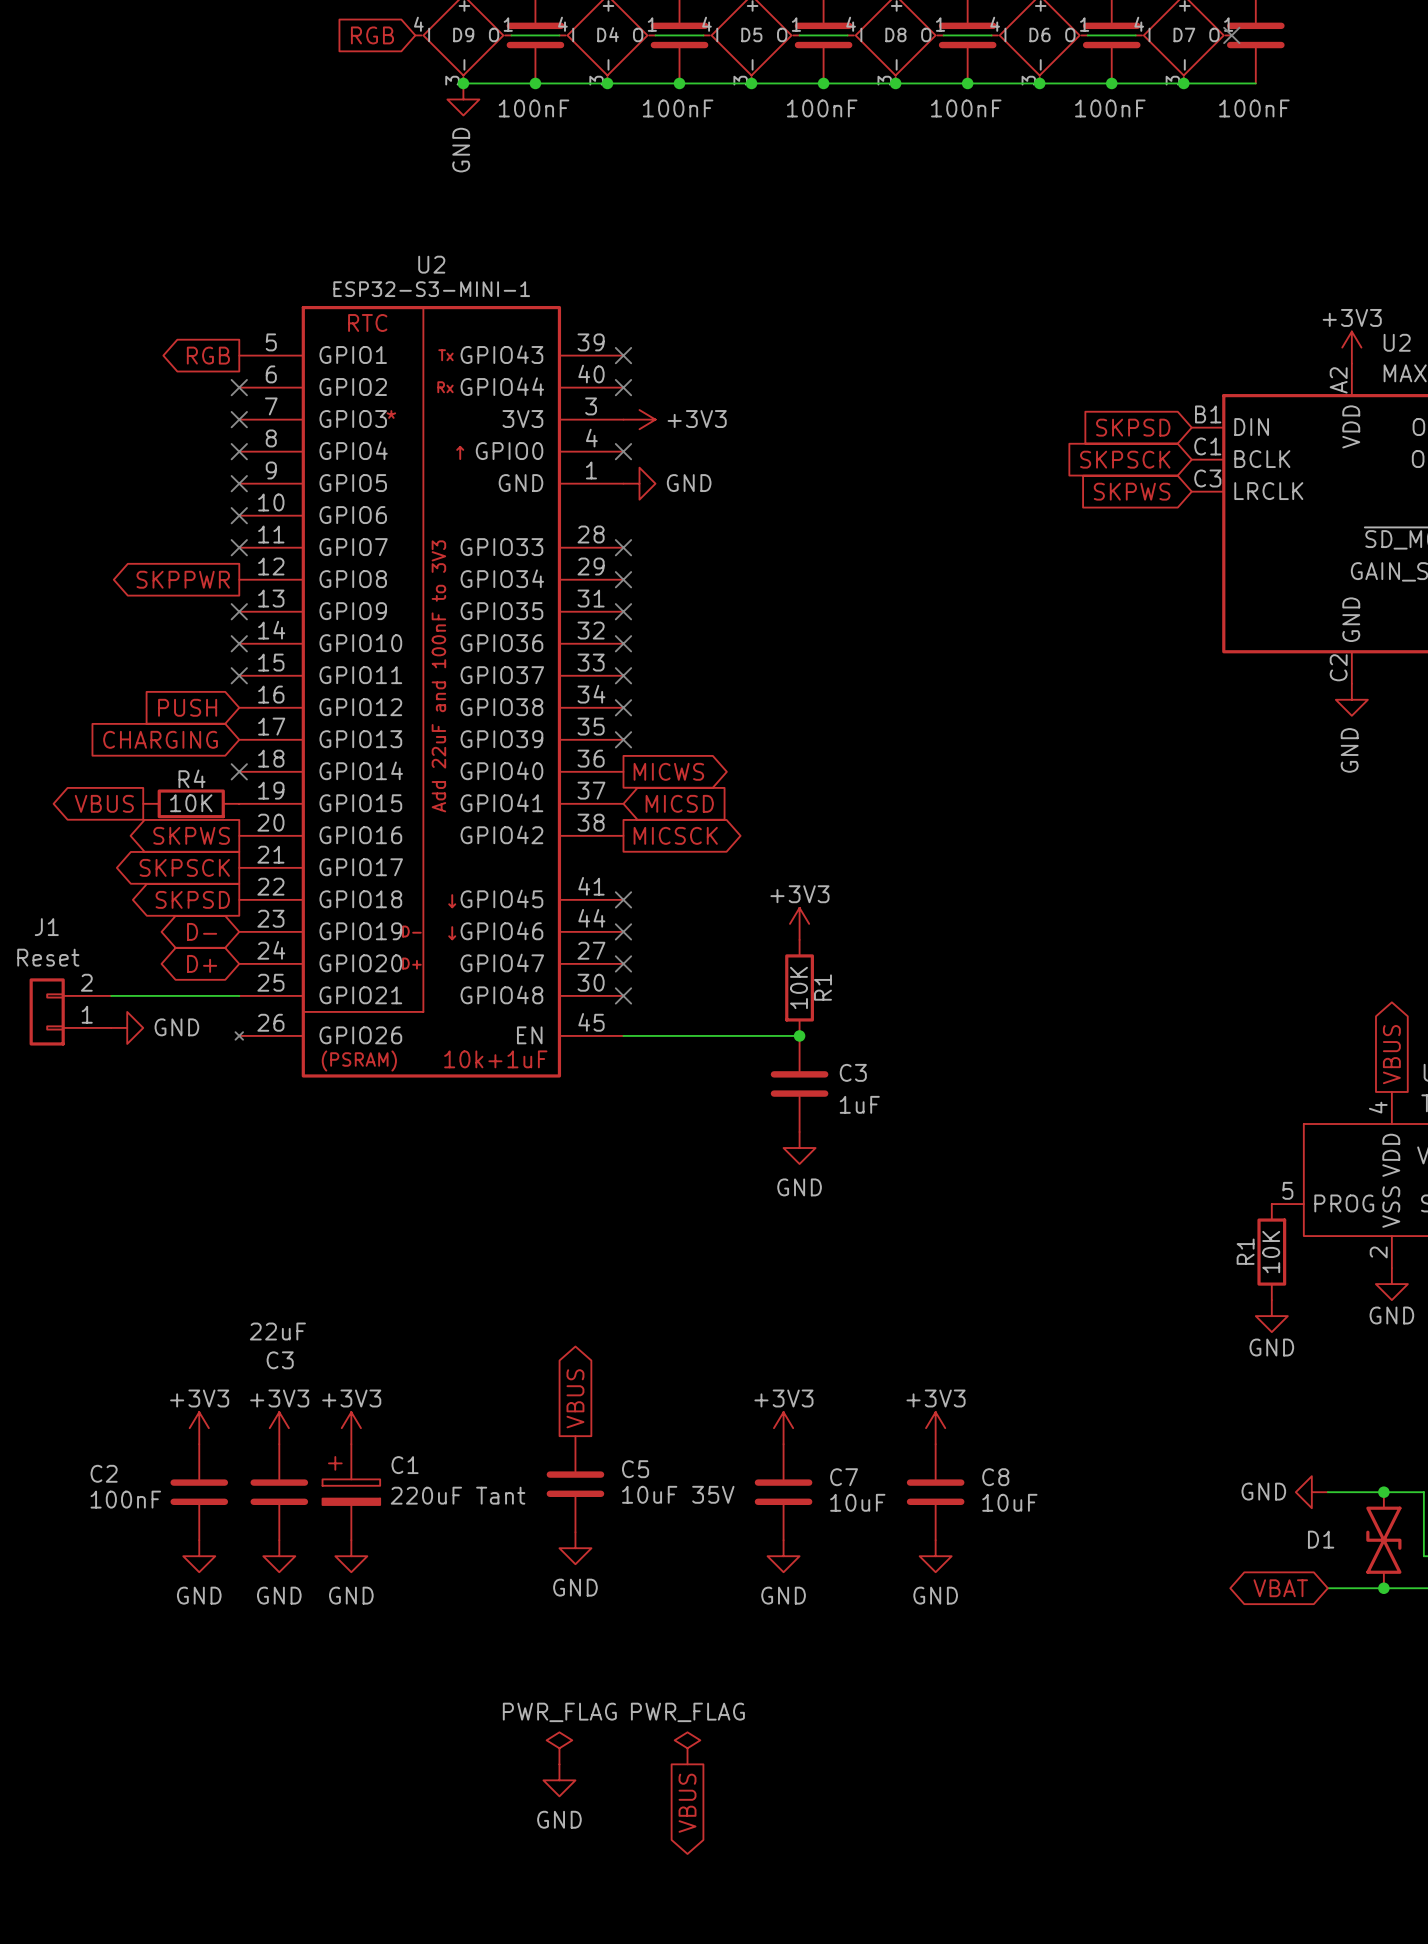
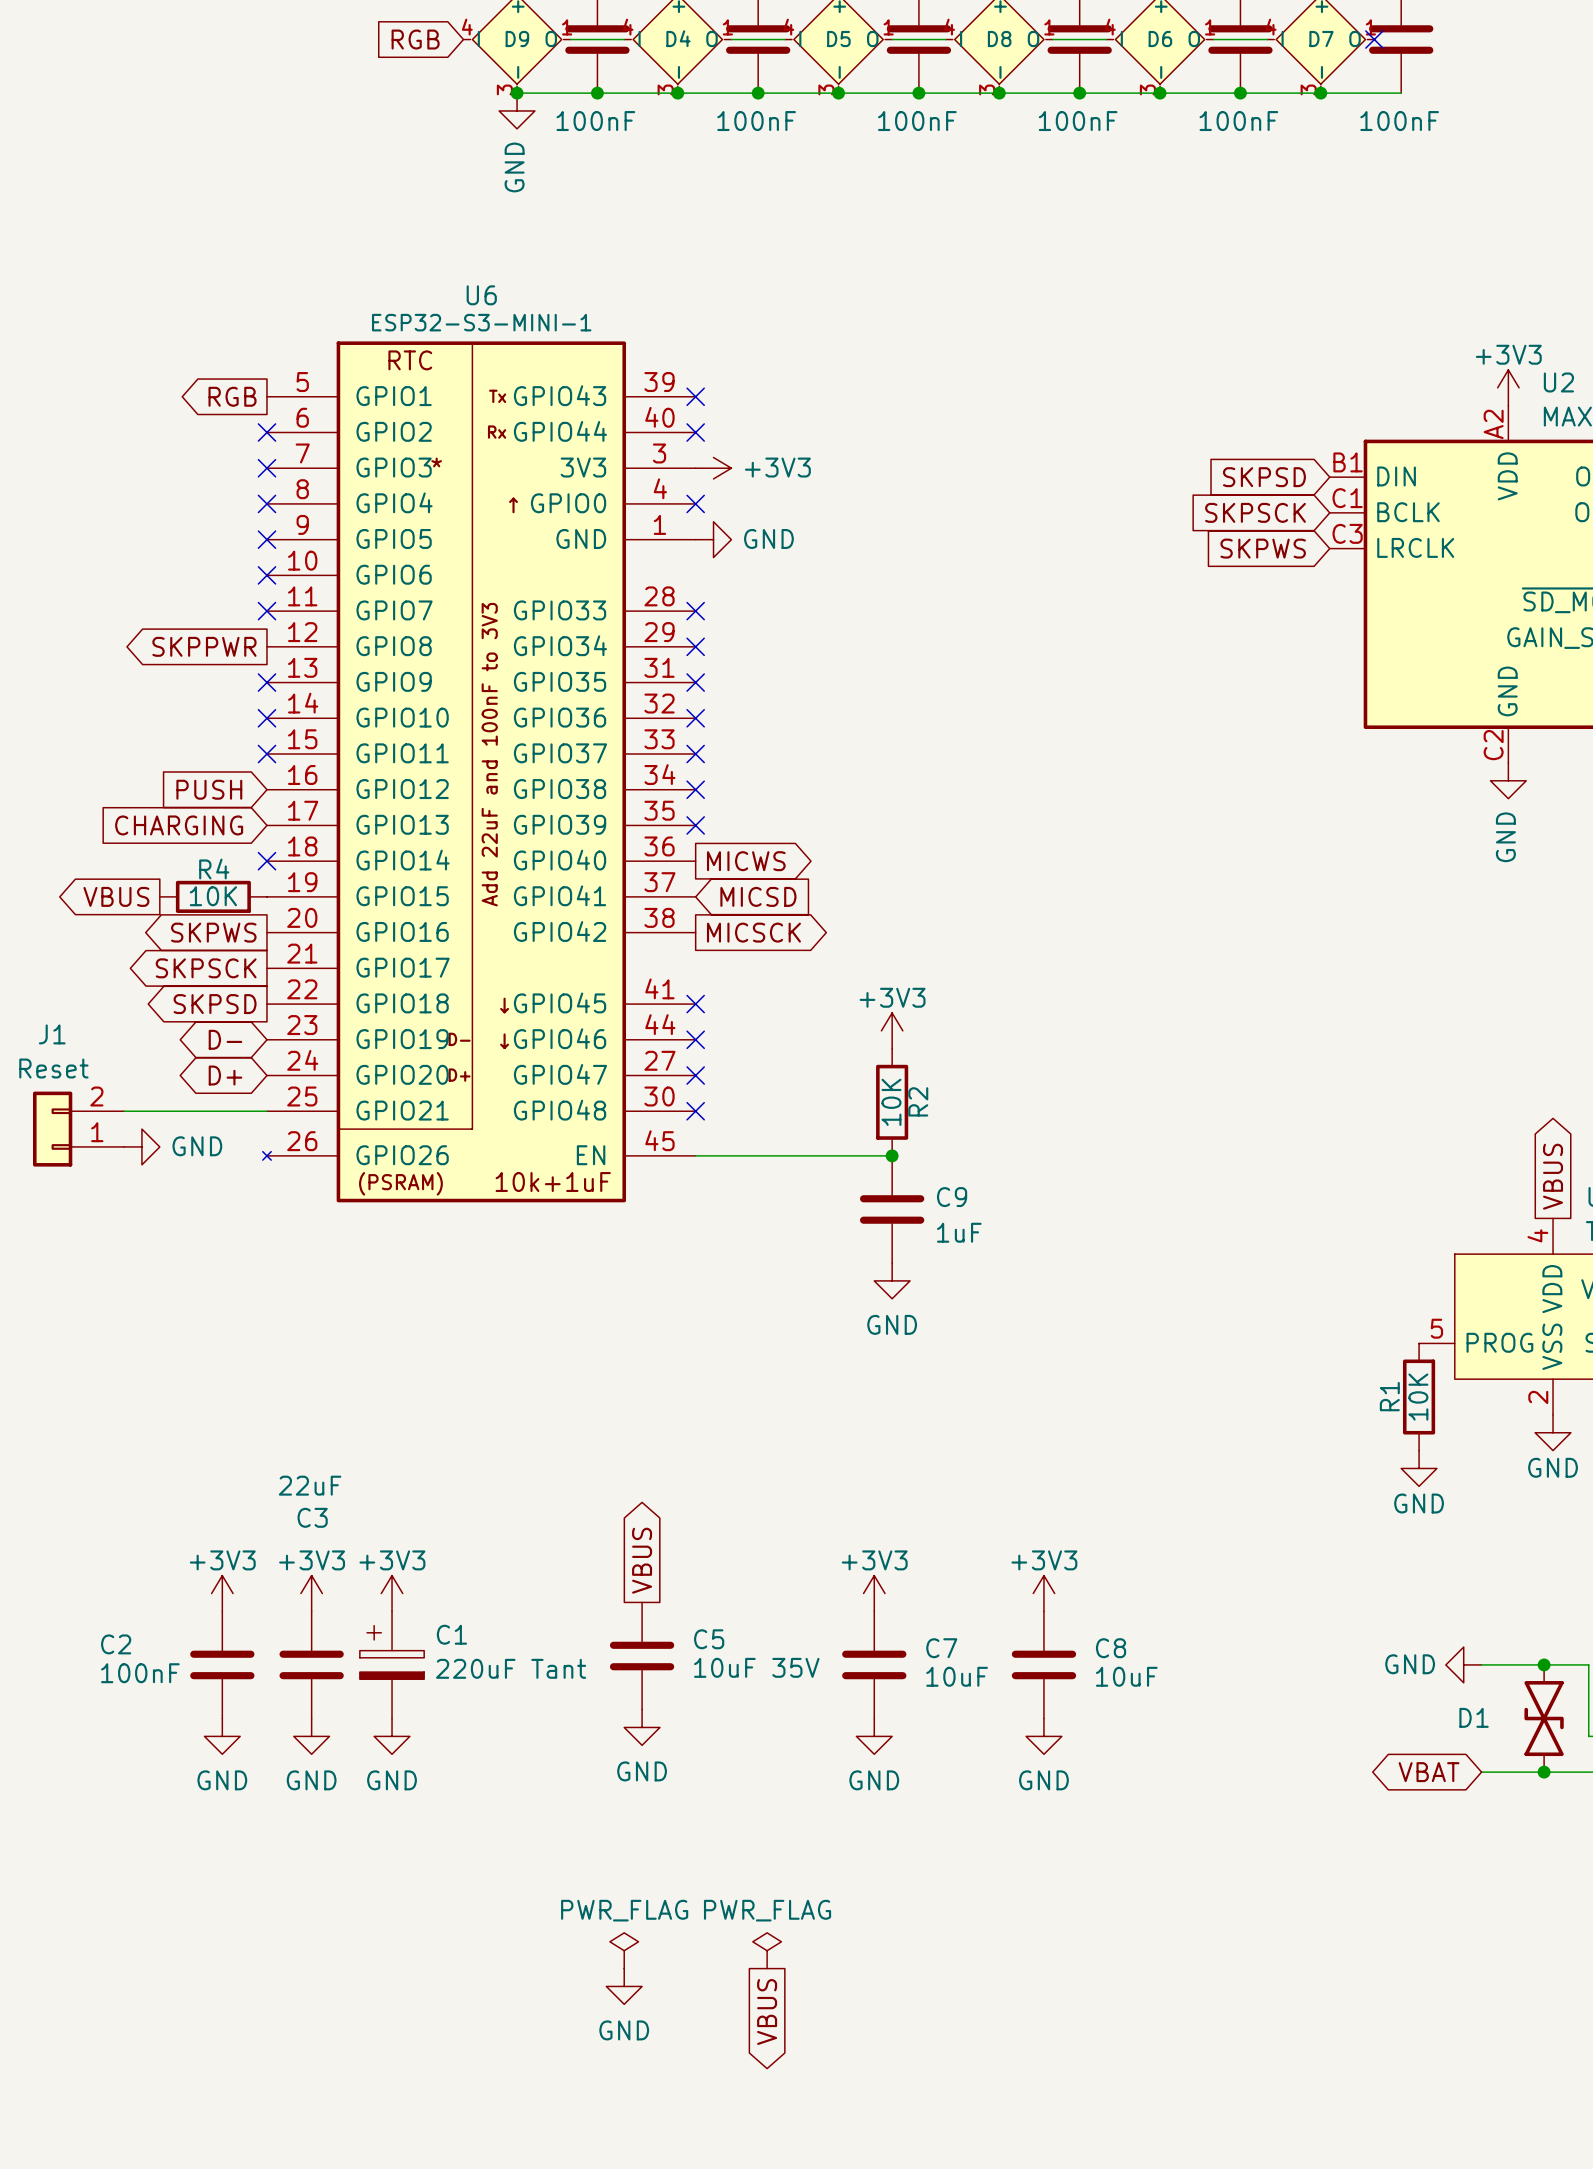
U2 name: U2 (431, 264) -> U6 (481, 295)
R1 name: R1 (822, 987) -> R2 (918, 1101)
C3 name: C3 (853, 1072) -> C9 (952, 1197)

